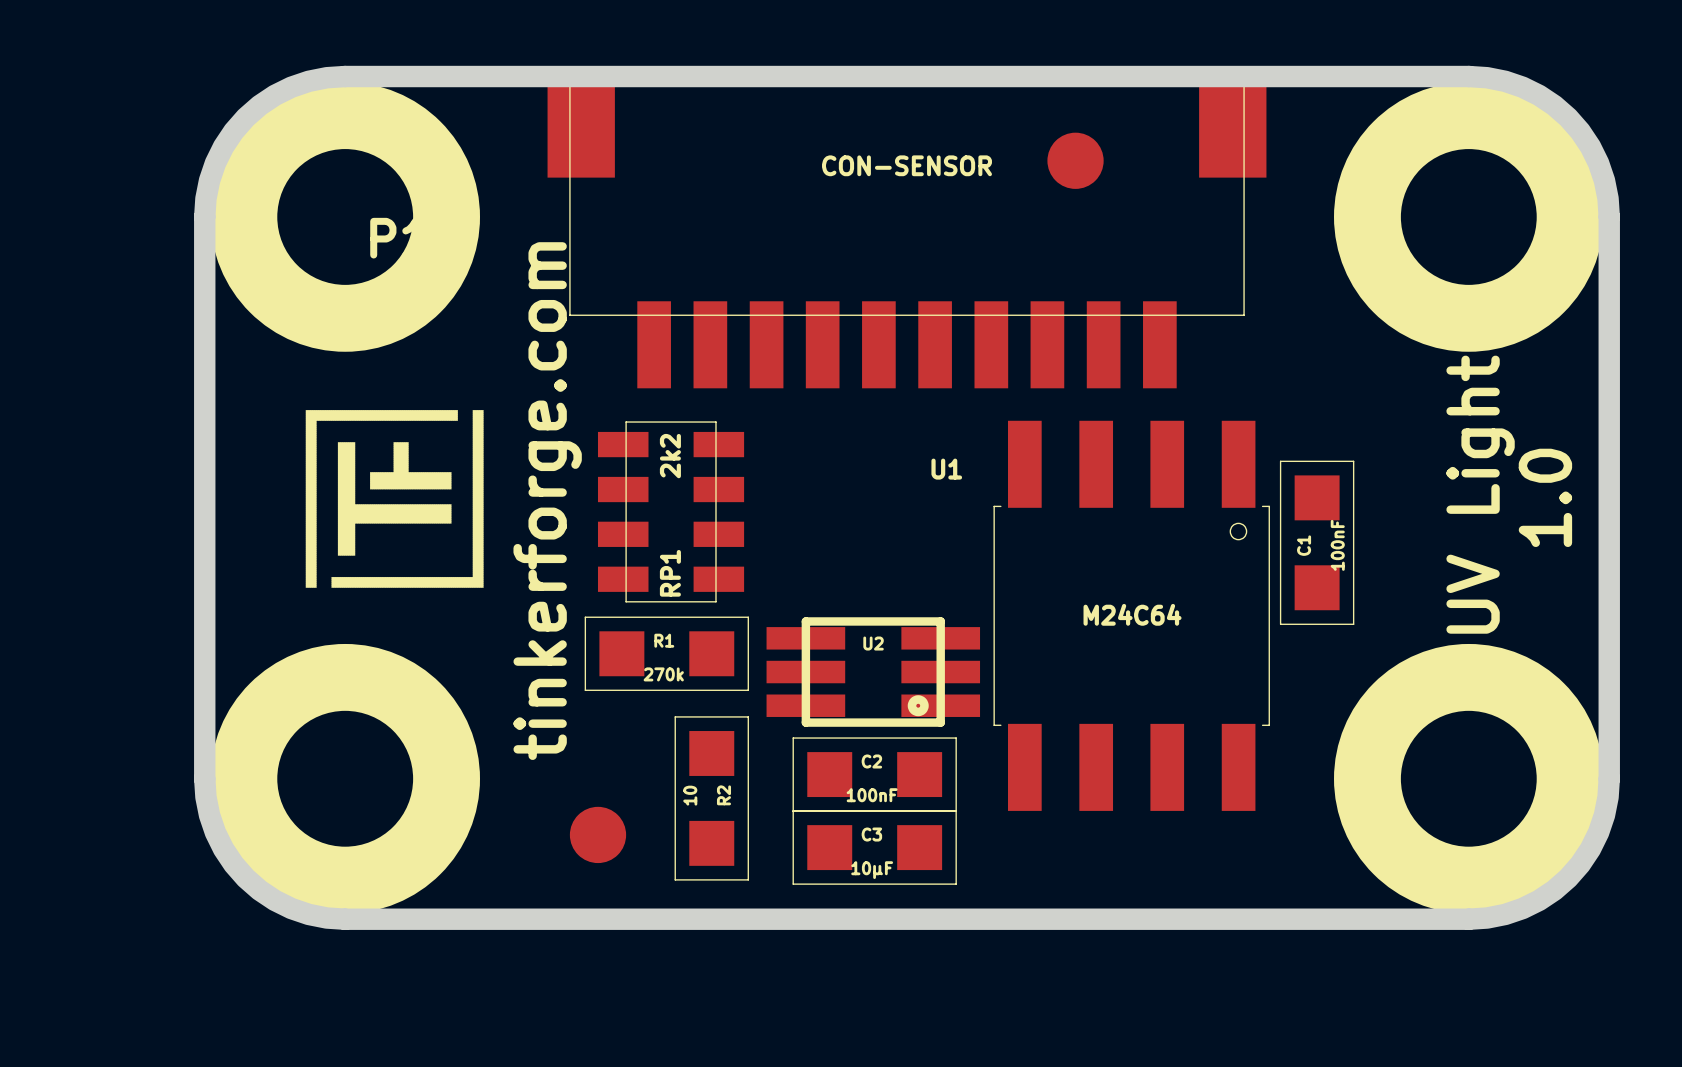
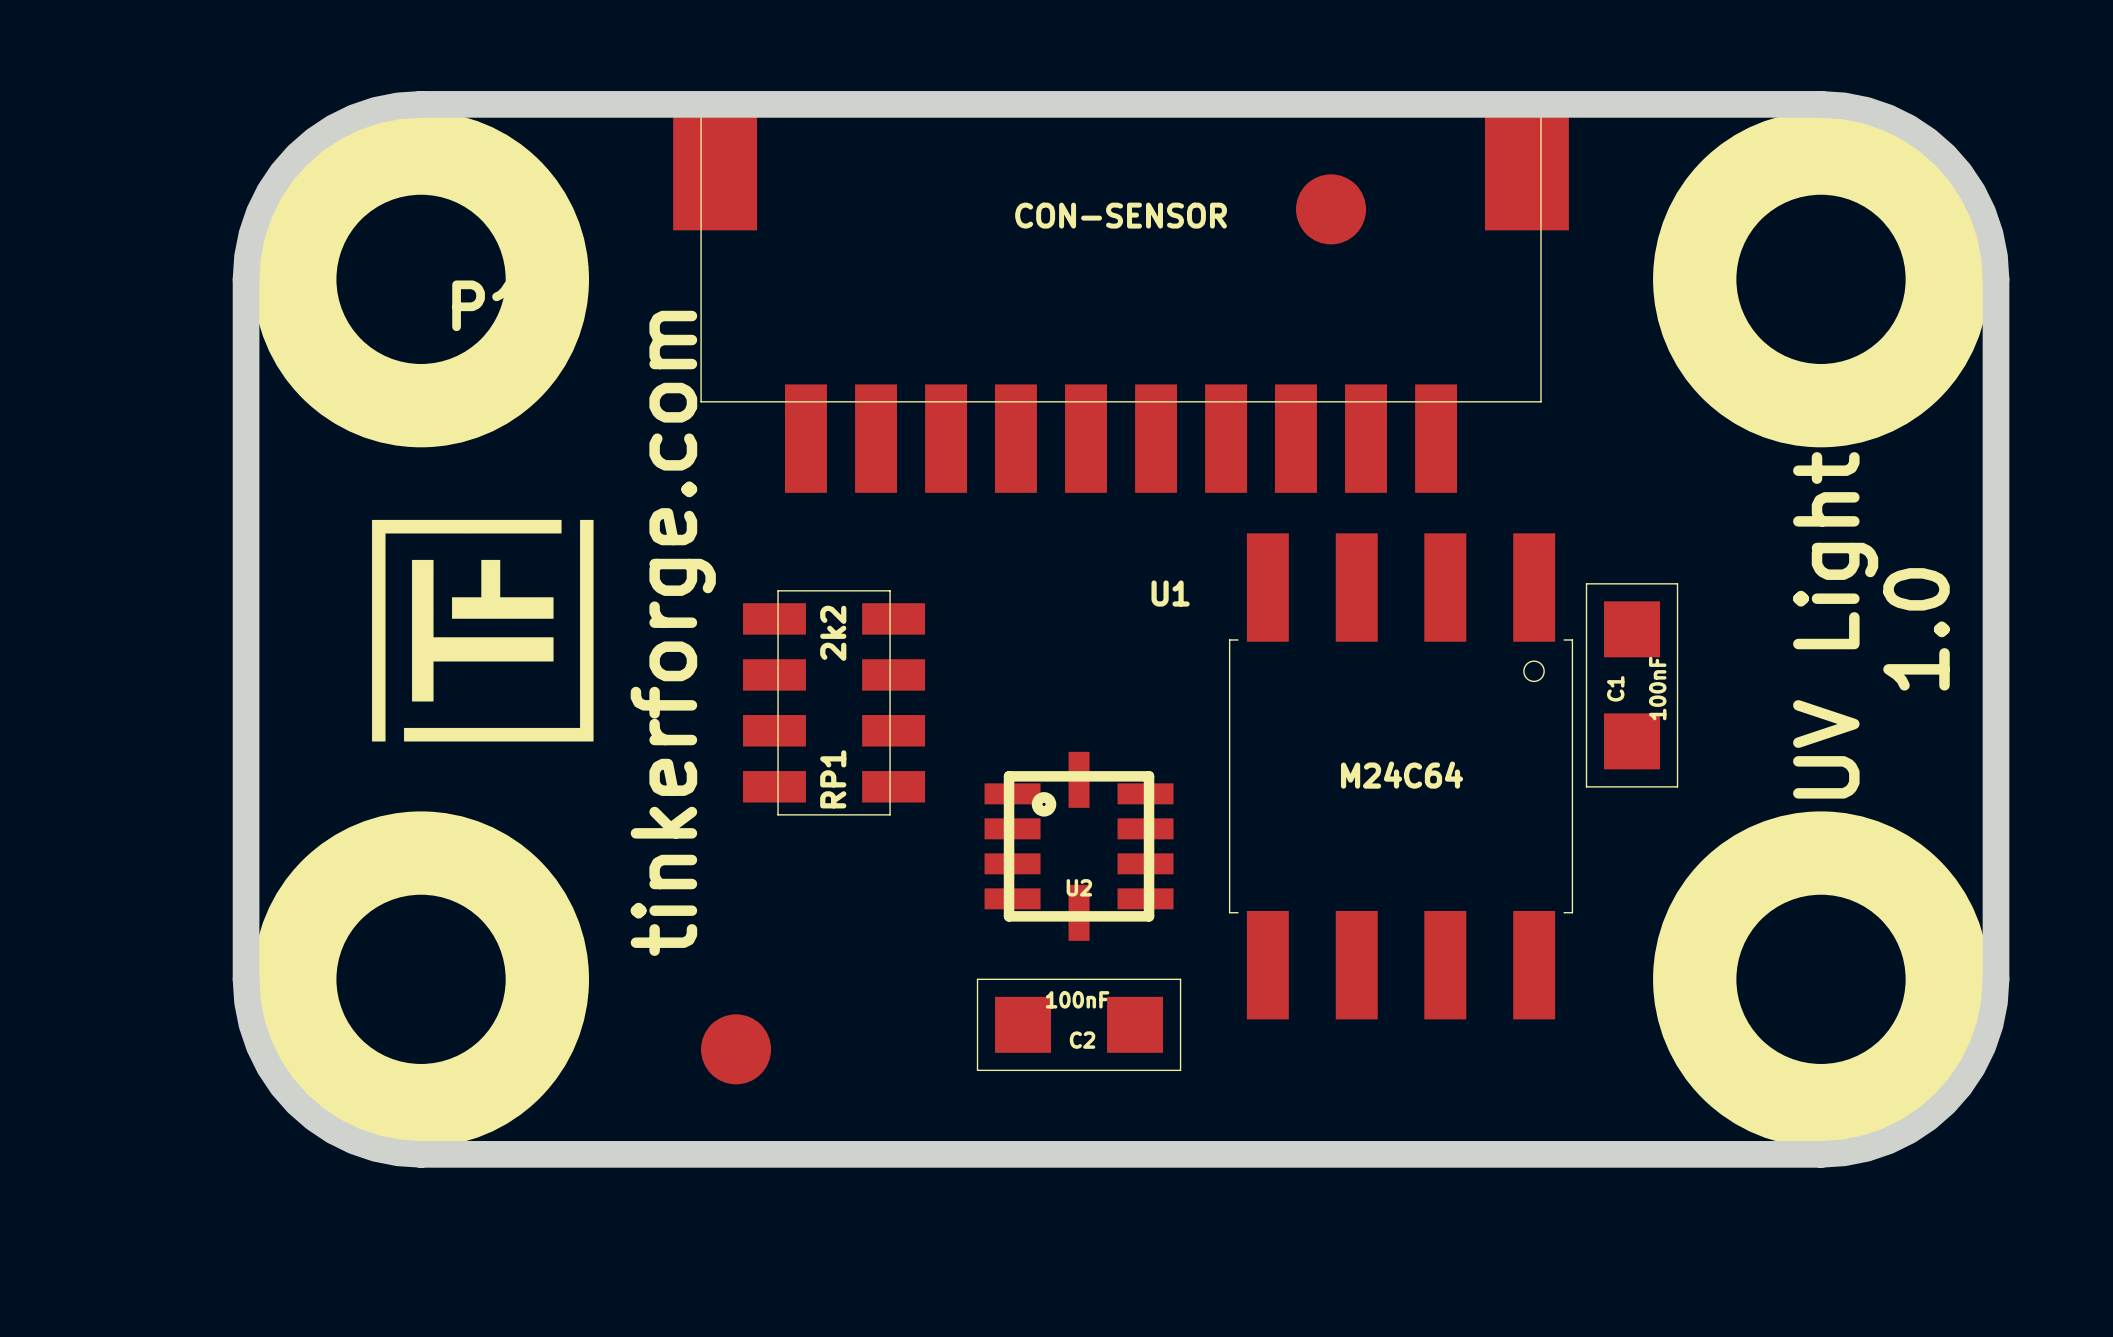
RP1 position: (671, 511) -> (834, 702)
U2 footprint: [766, 617, 981, 727] -> [984, 751, 1174, 941]
U2 name position: U2 (873, 643) -> U2 (1079, 887)
R1: 270k (666, 653) -> none
C2 name position: C2 (871, 761) -> C2 (1082, 1040)
C2 position: (874, 774) -> (1079, 1024)
R2: 10 (711, 798) -> none
C3: 10µF (874, 847) -> none

